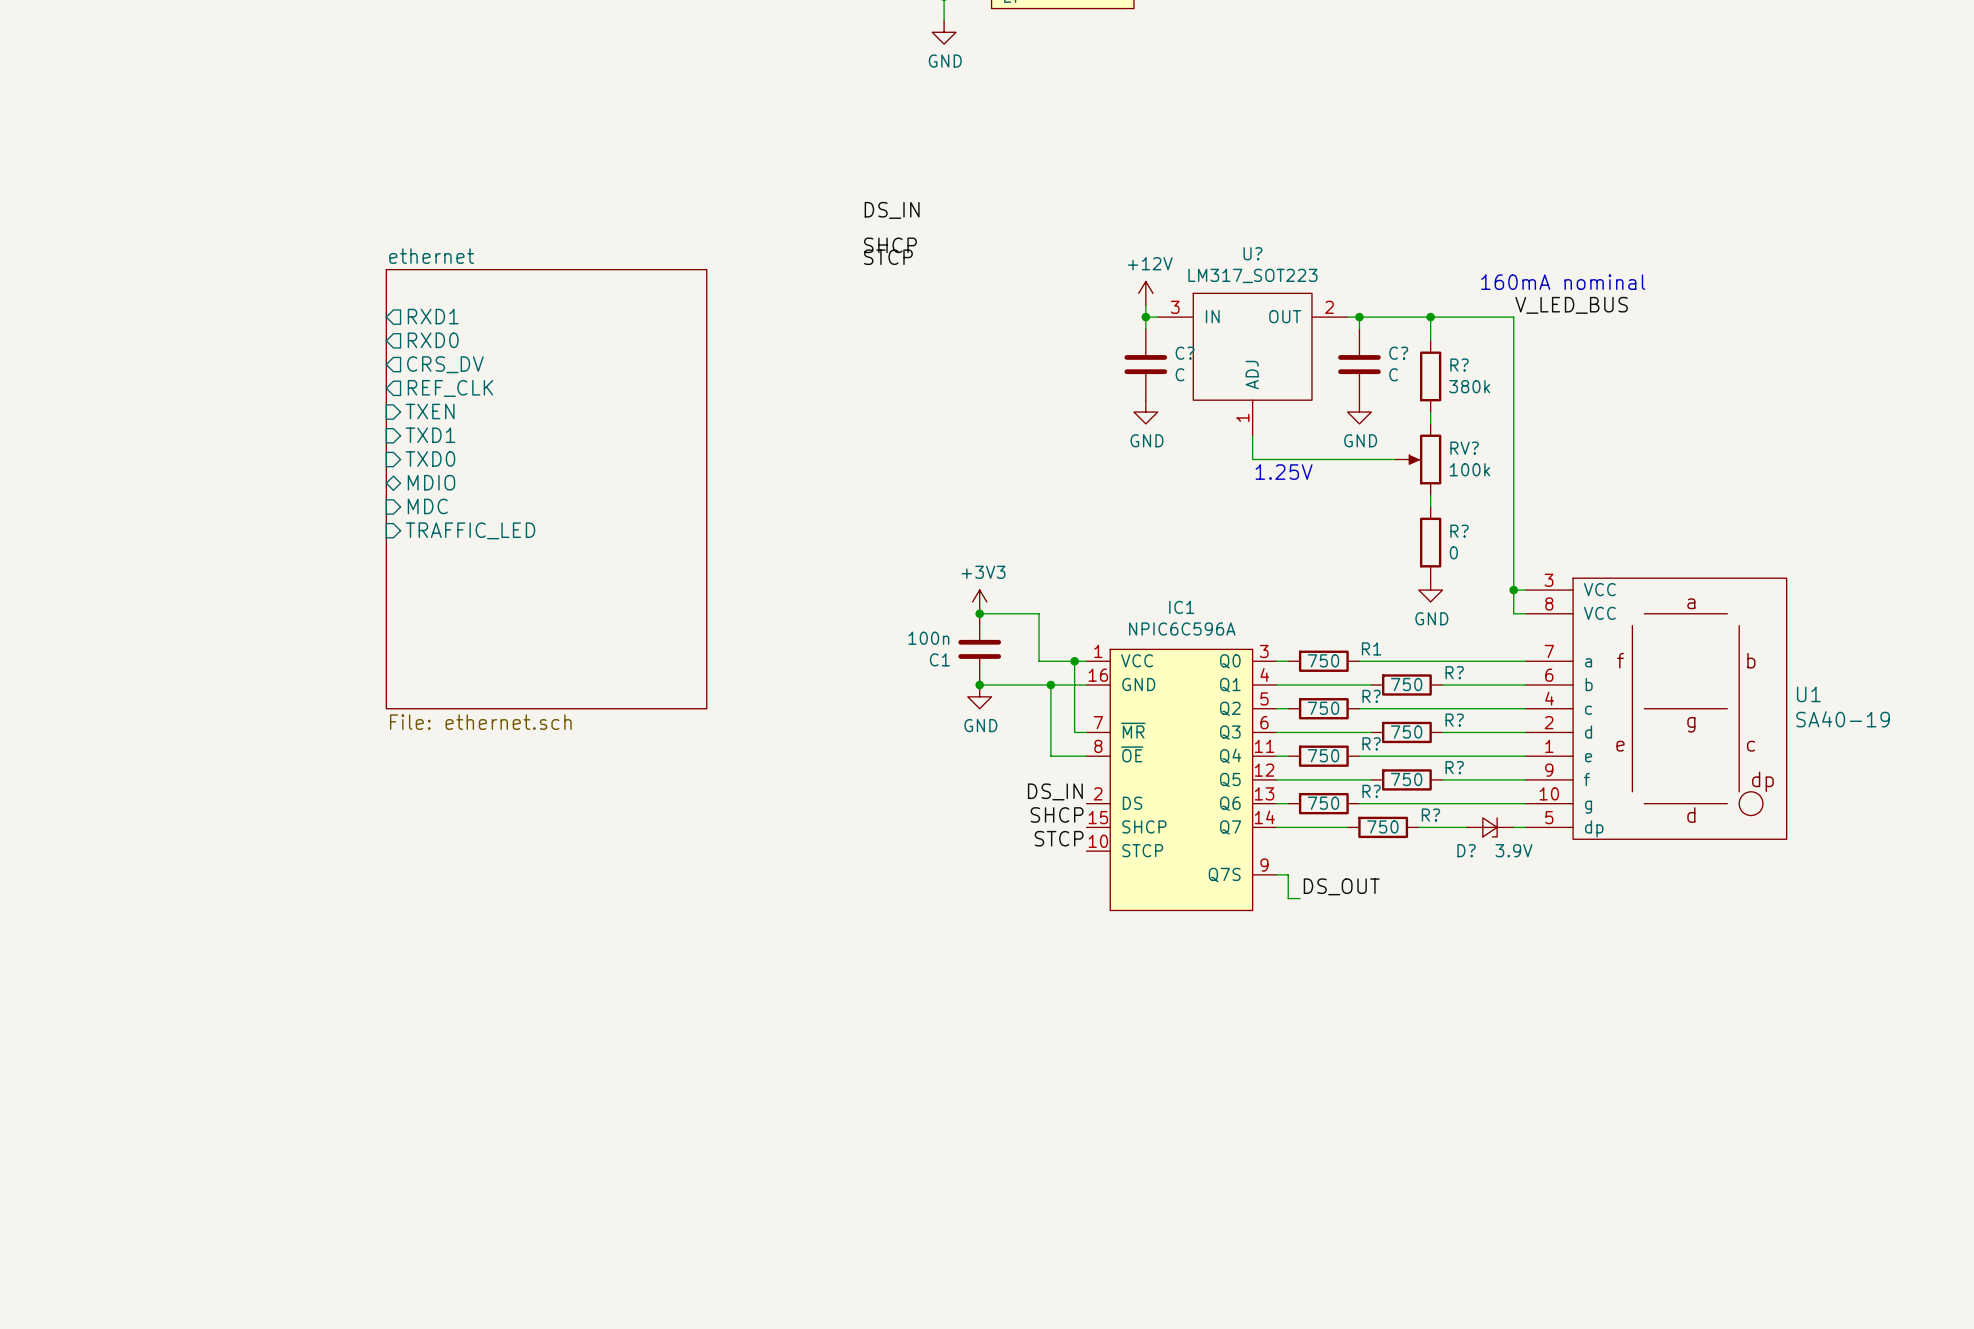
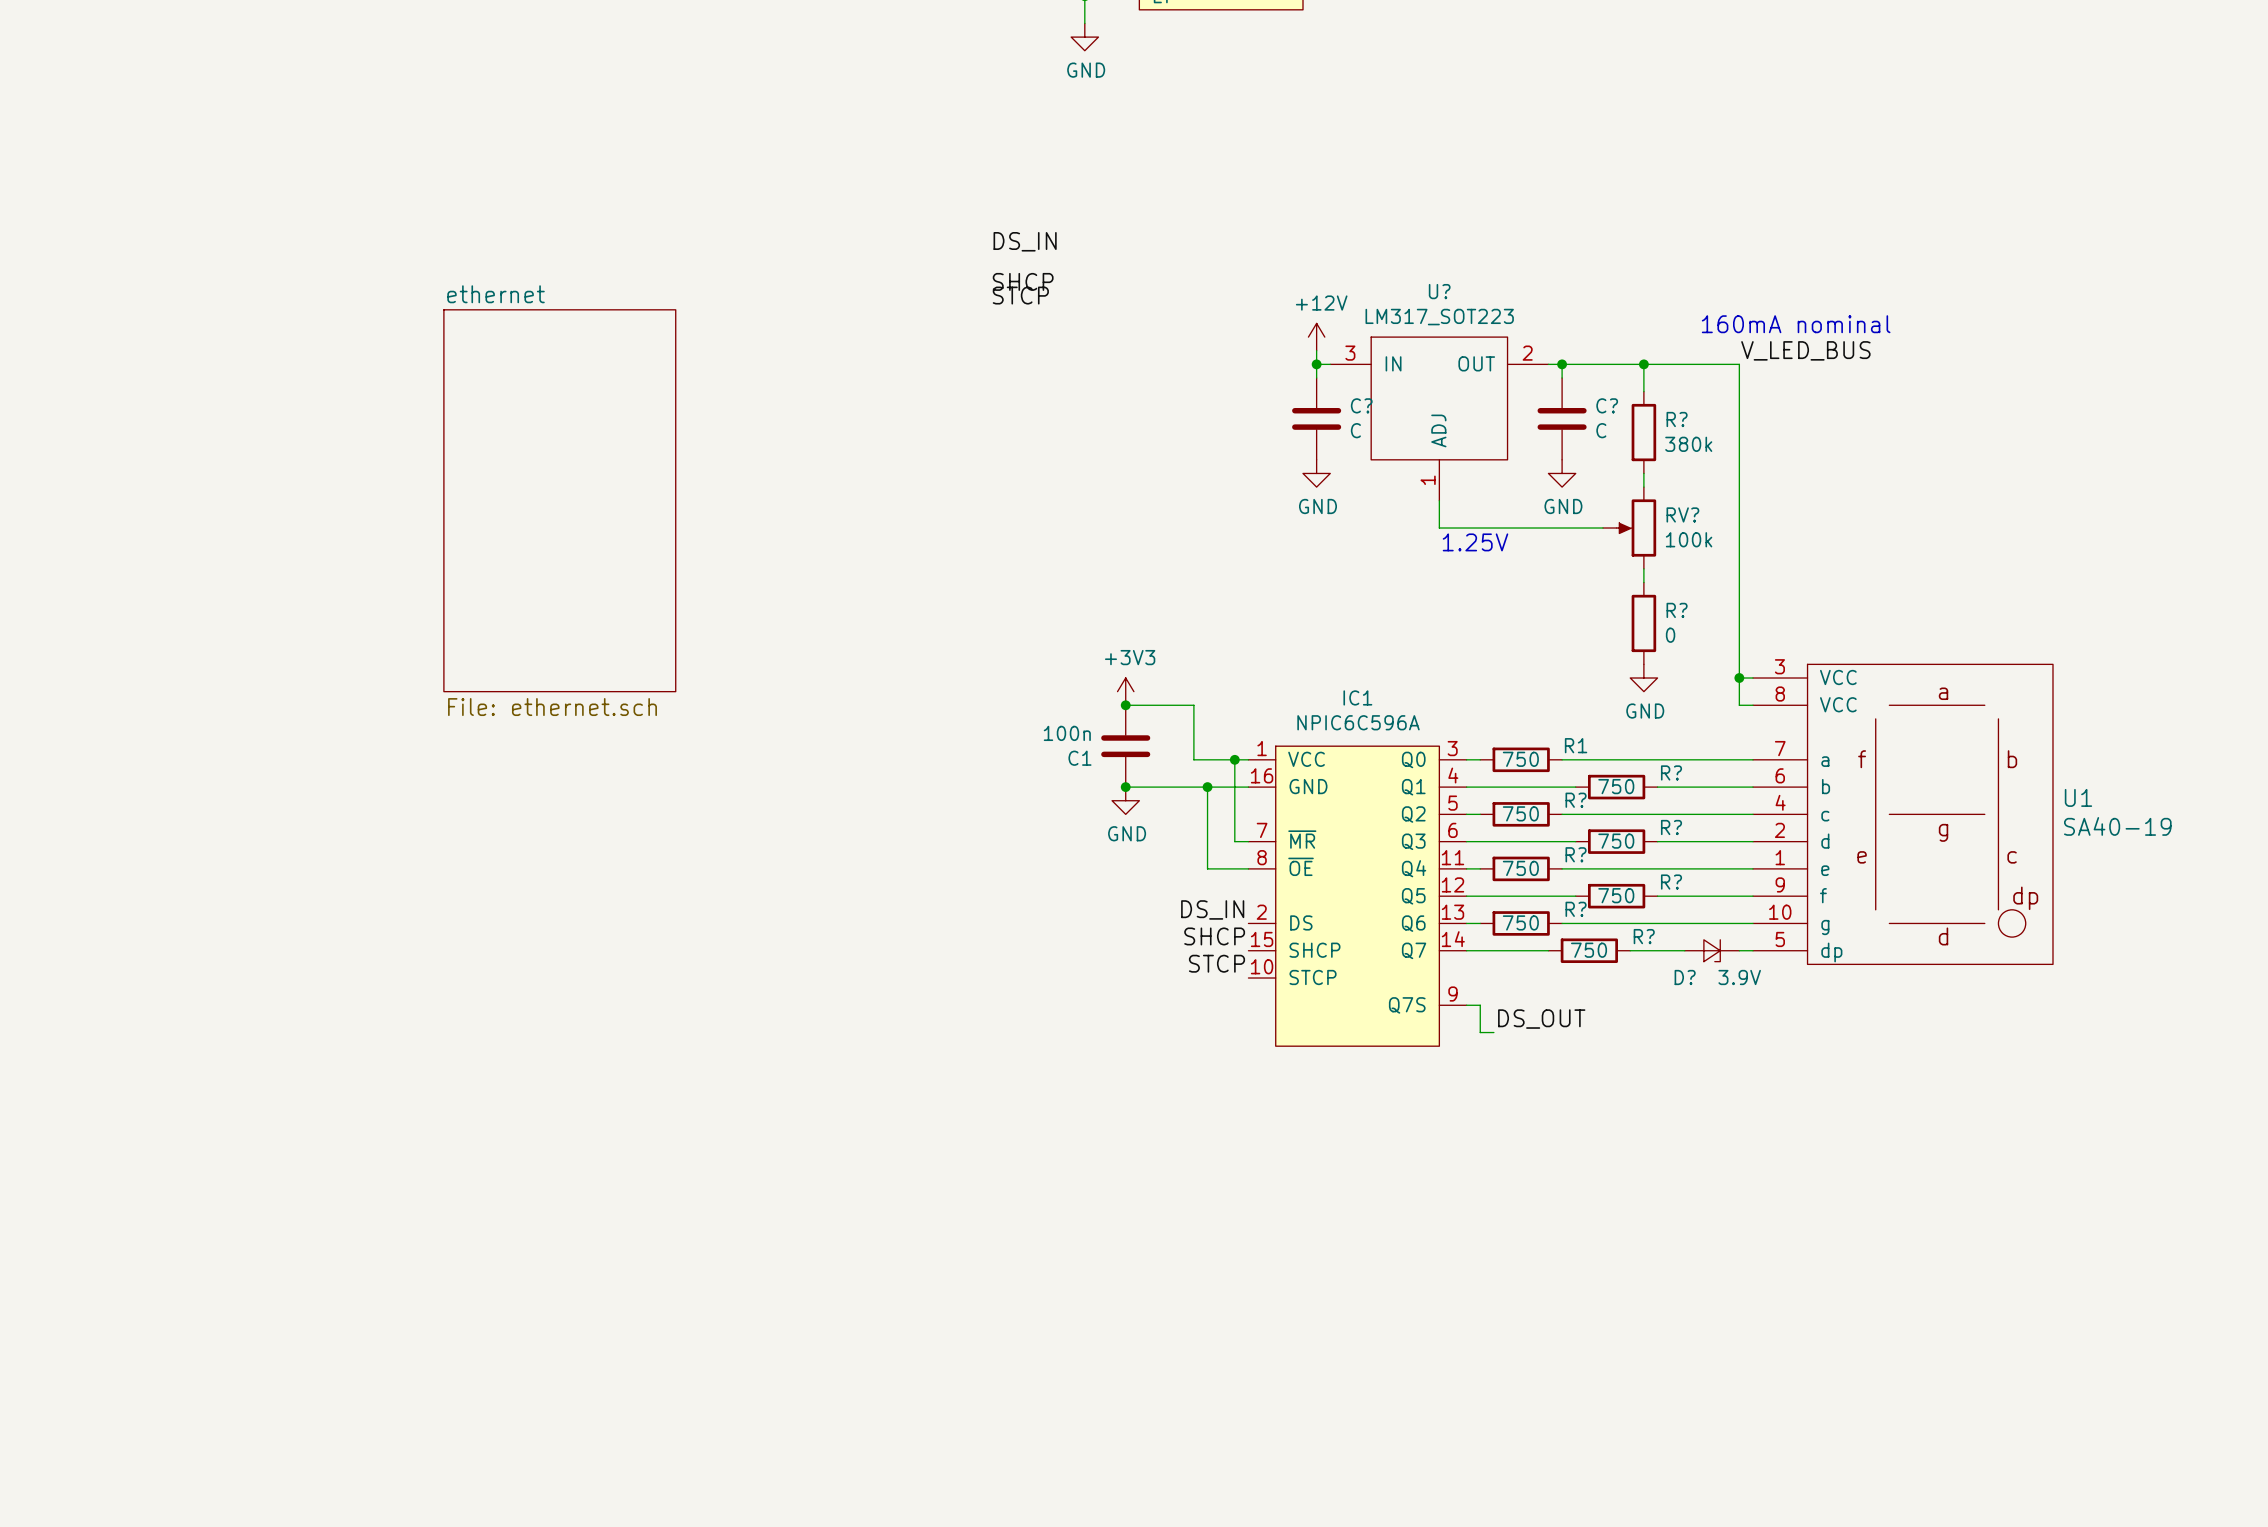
sheet pin: RXD1 (433, 316) -> none
sheet pin: RXD0 (433, 340) -> none
sheet pin: CRS_DV (445, 364) -> none
sheet pin: REF_CLK (450, 388) -> none
sheet pin: TXEN (430, 411) -> none
sheet pin: TXD1 (430, 435) -> none
sheet ethernet: none -> File: ethernet.sch (559, 500)
sheet pin: TXD0 (430, 458) -> none
sheet pin: MDIO (431, 482) -> none
sheet ethernet: File: ethernet.sch (546, 489) -> none
sheet pin: MDC (427, 506) -> none
sheet pin: TRAFFIC_LED (470, 530) -> none

